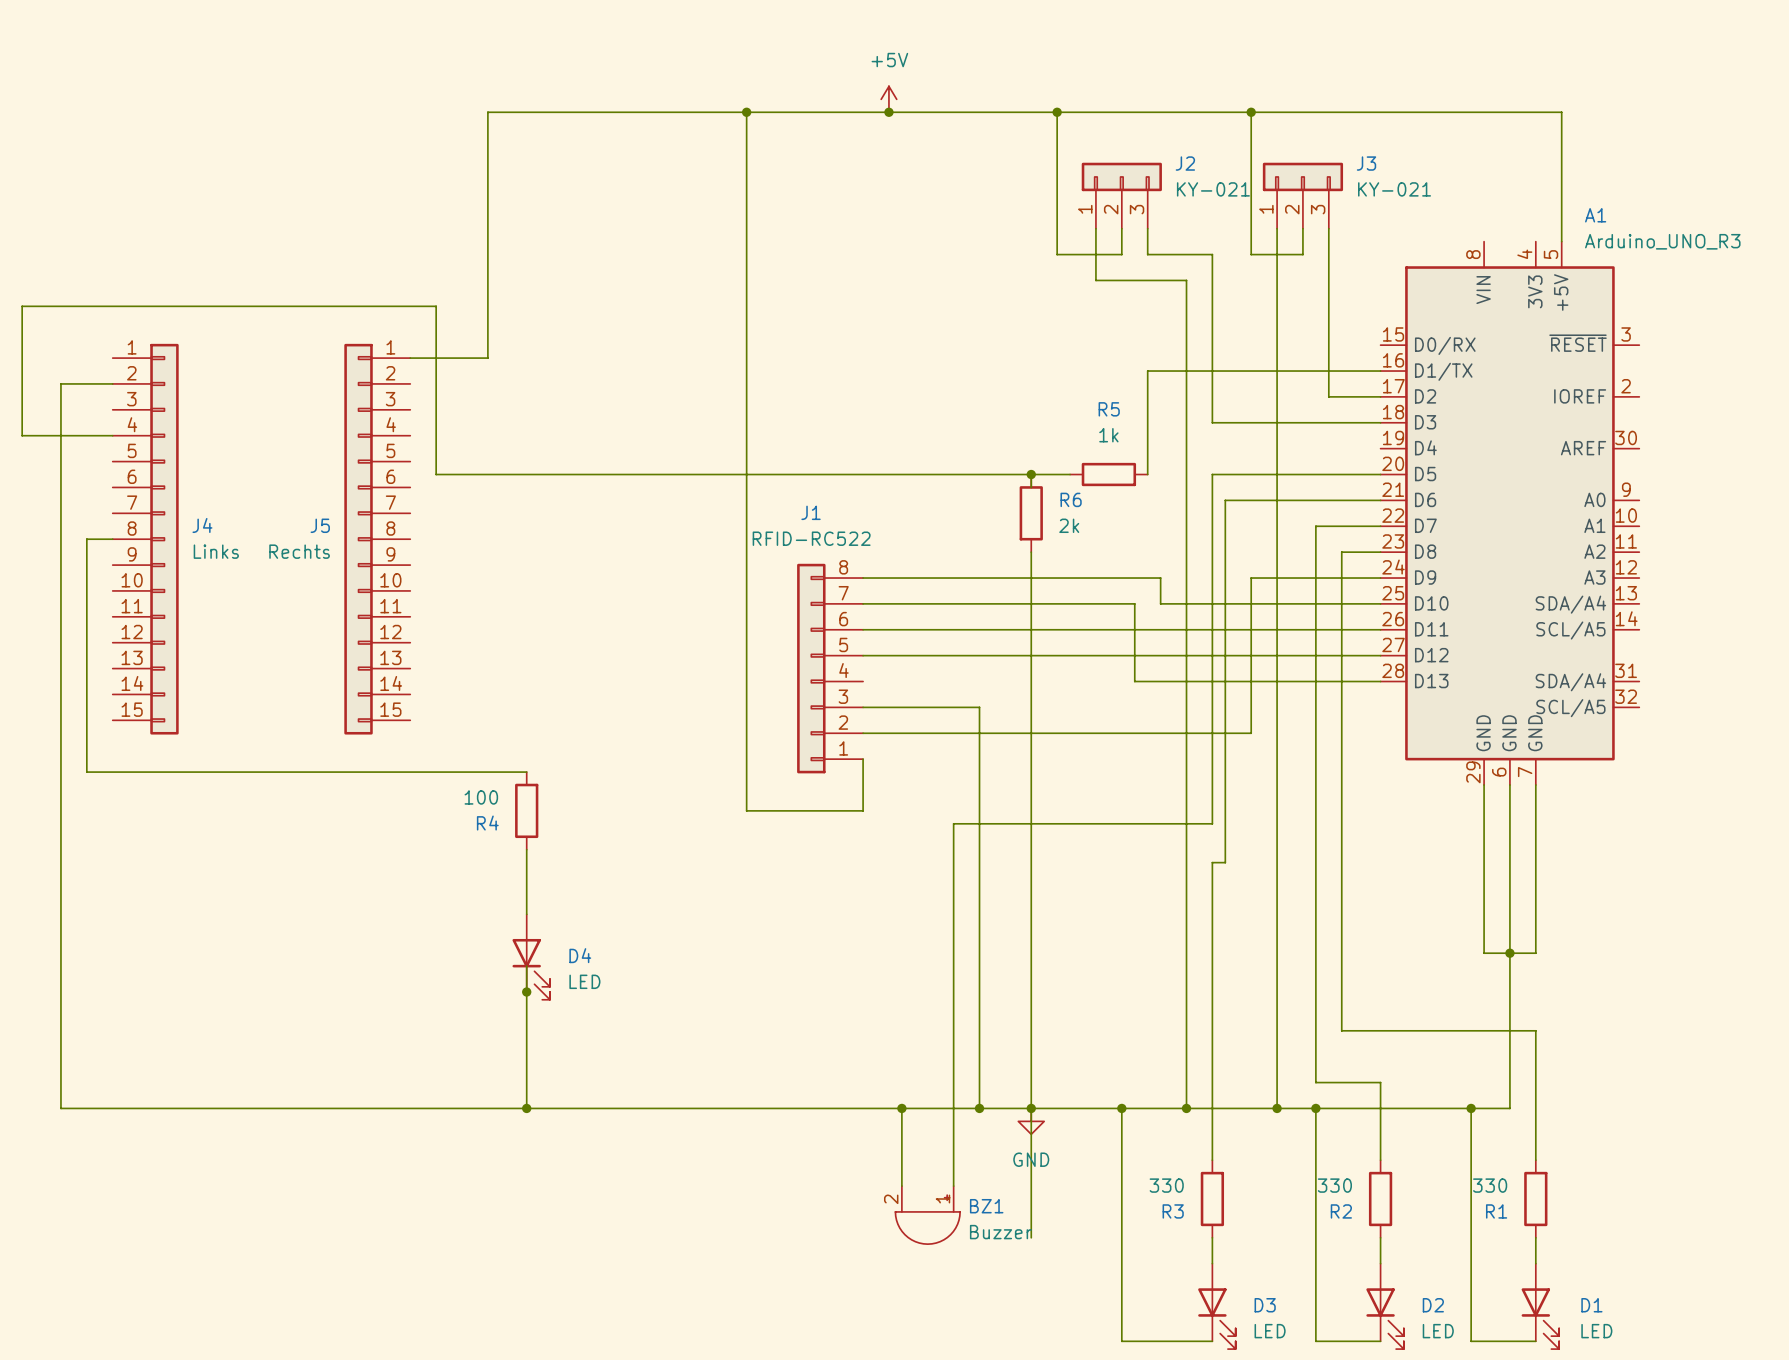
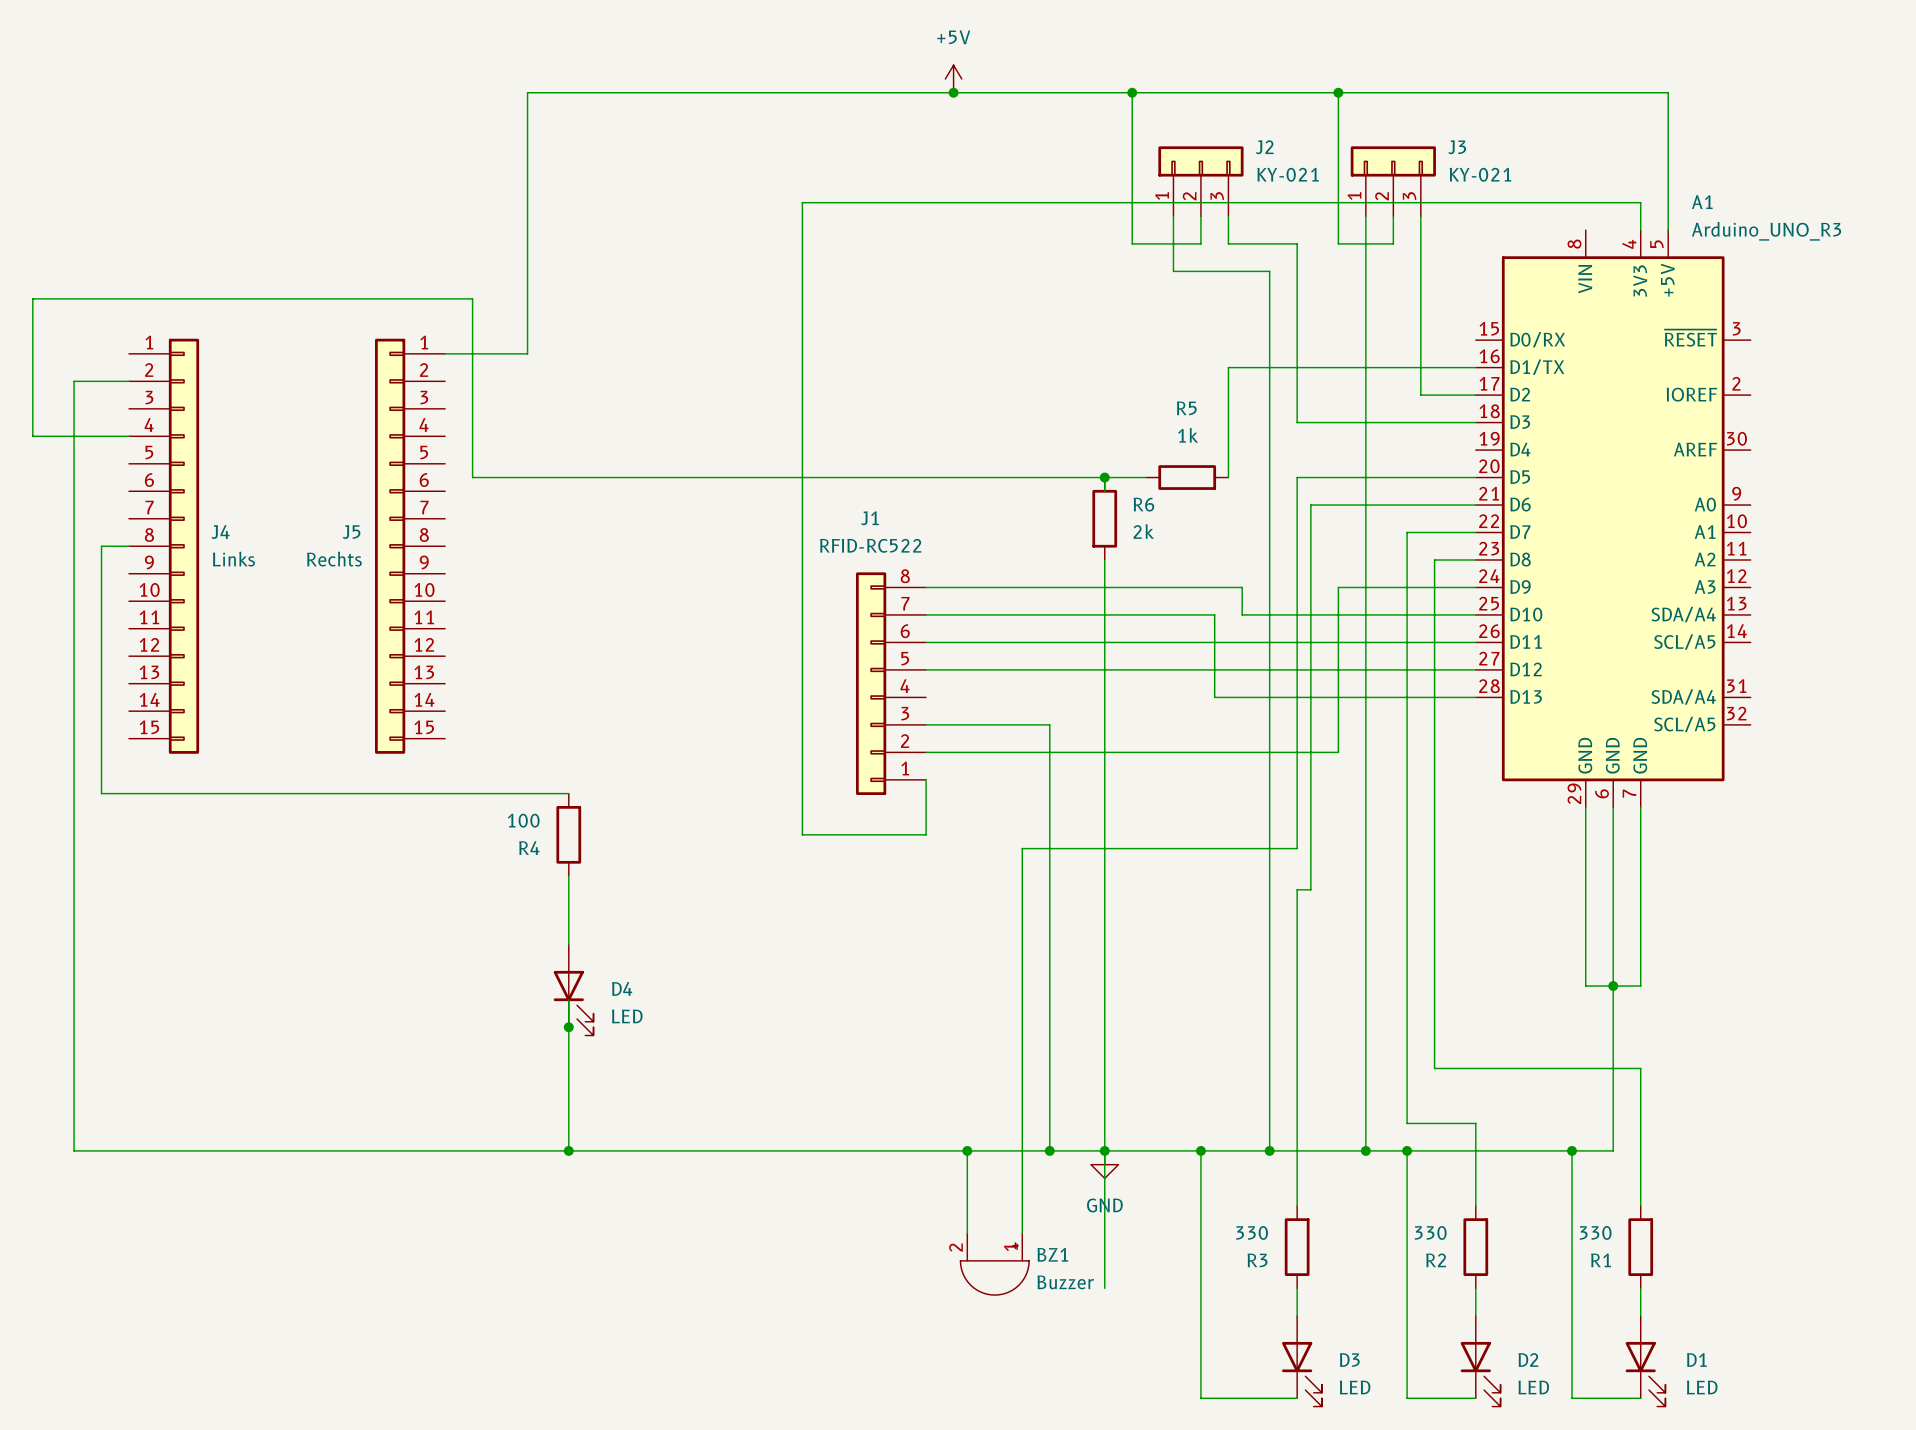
wire: (746, 112) (746, 215) -> (1640, 230) (1640, 202) (802, 202)
junction: (746, 112) -> none

